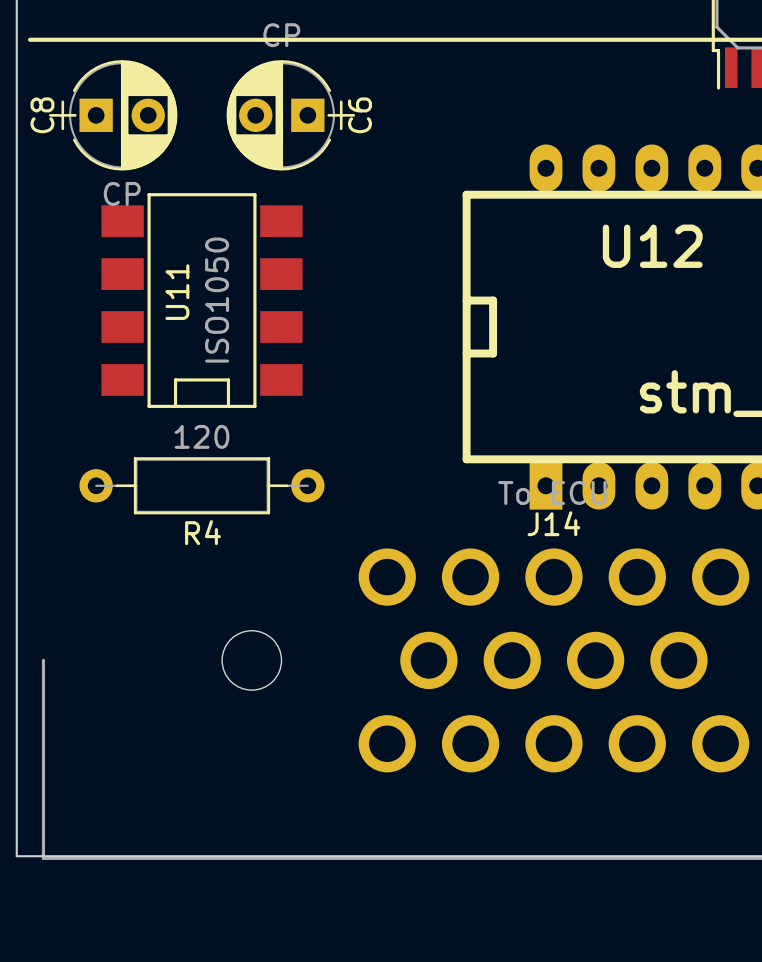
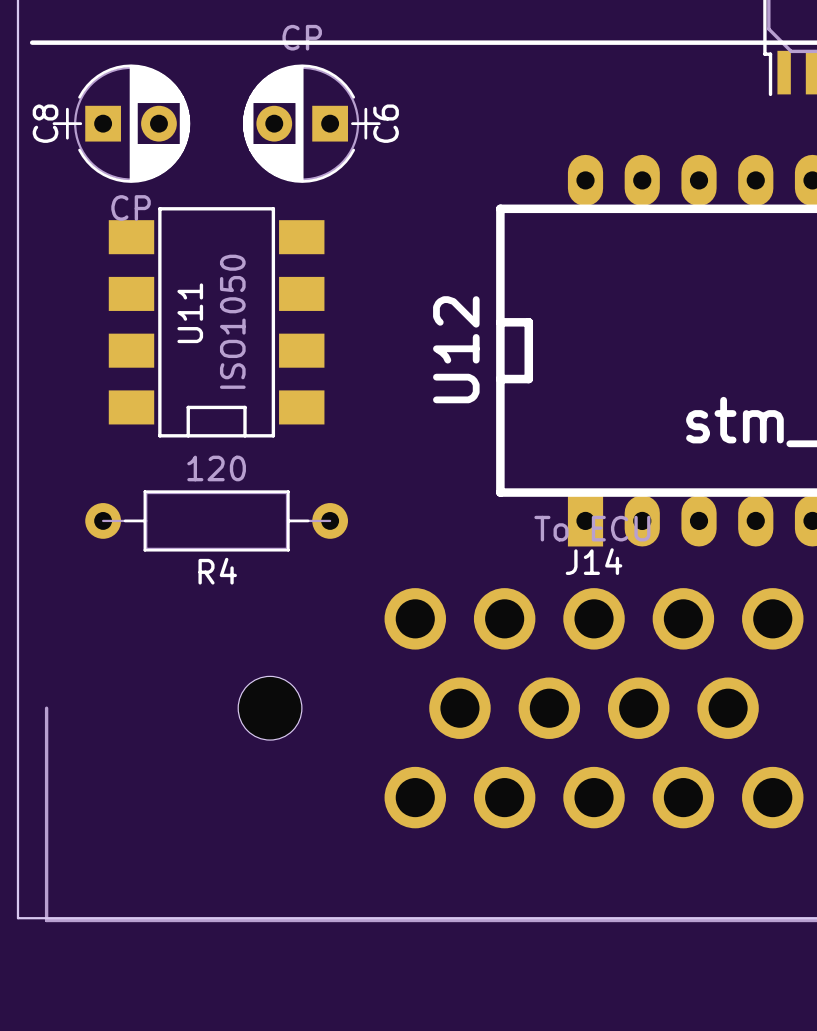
U12 name rotation: 0° (652, 246) -> 90° counterclockwise (456, 349)
U12 name position: U12 (652, 246) -> U12 (456, 349)

